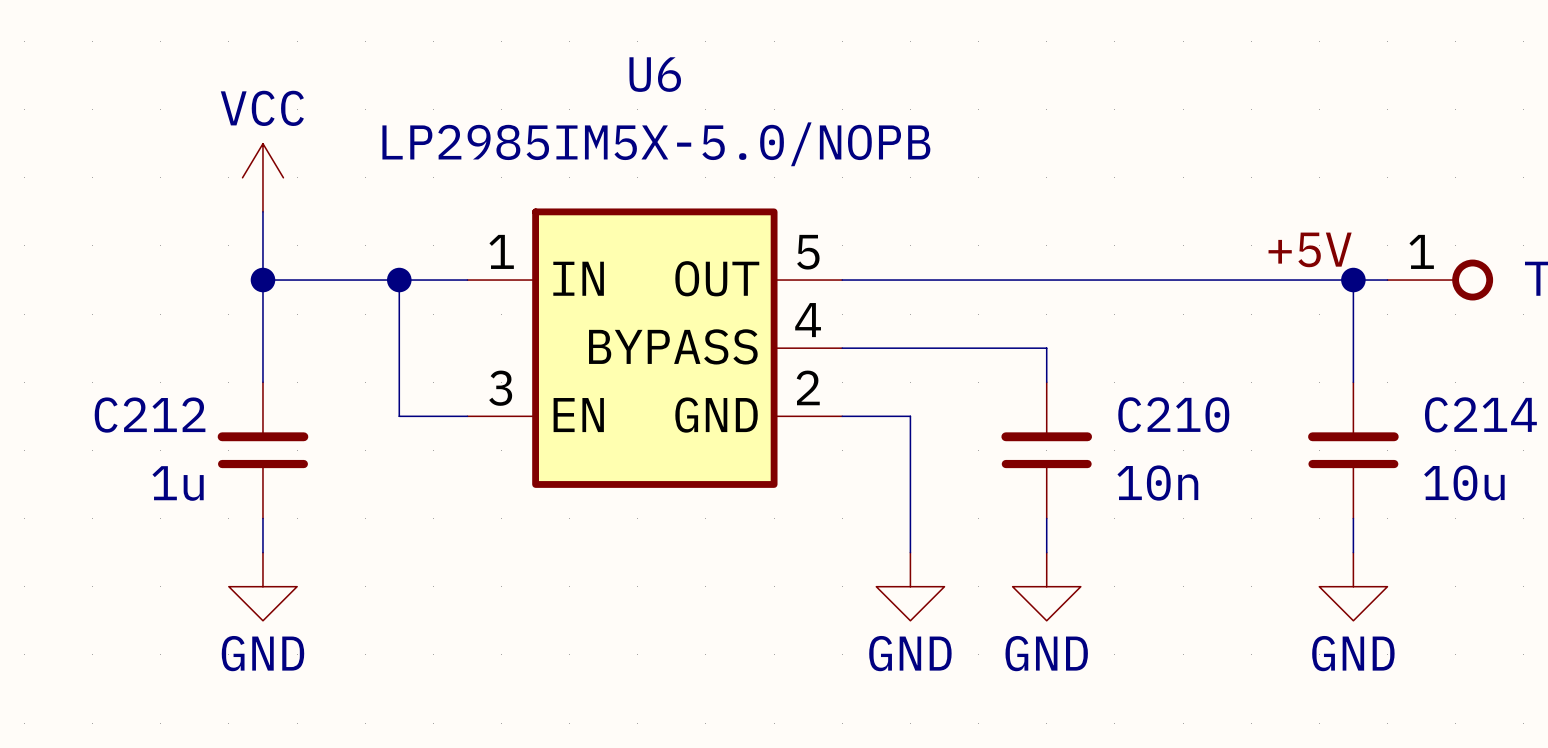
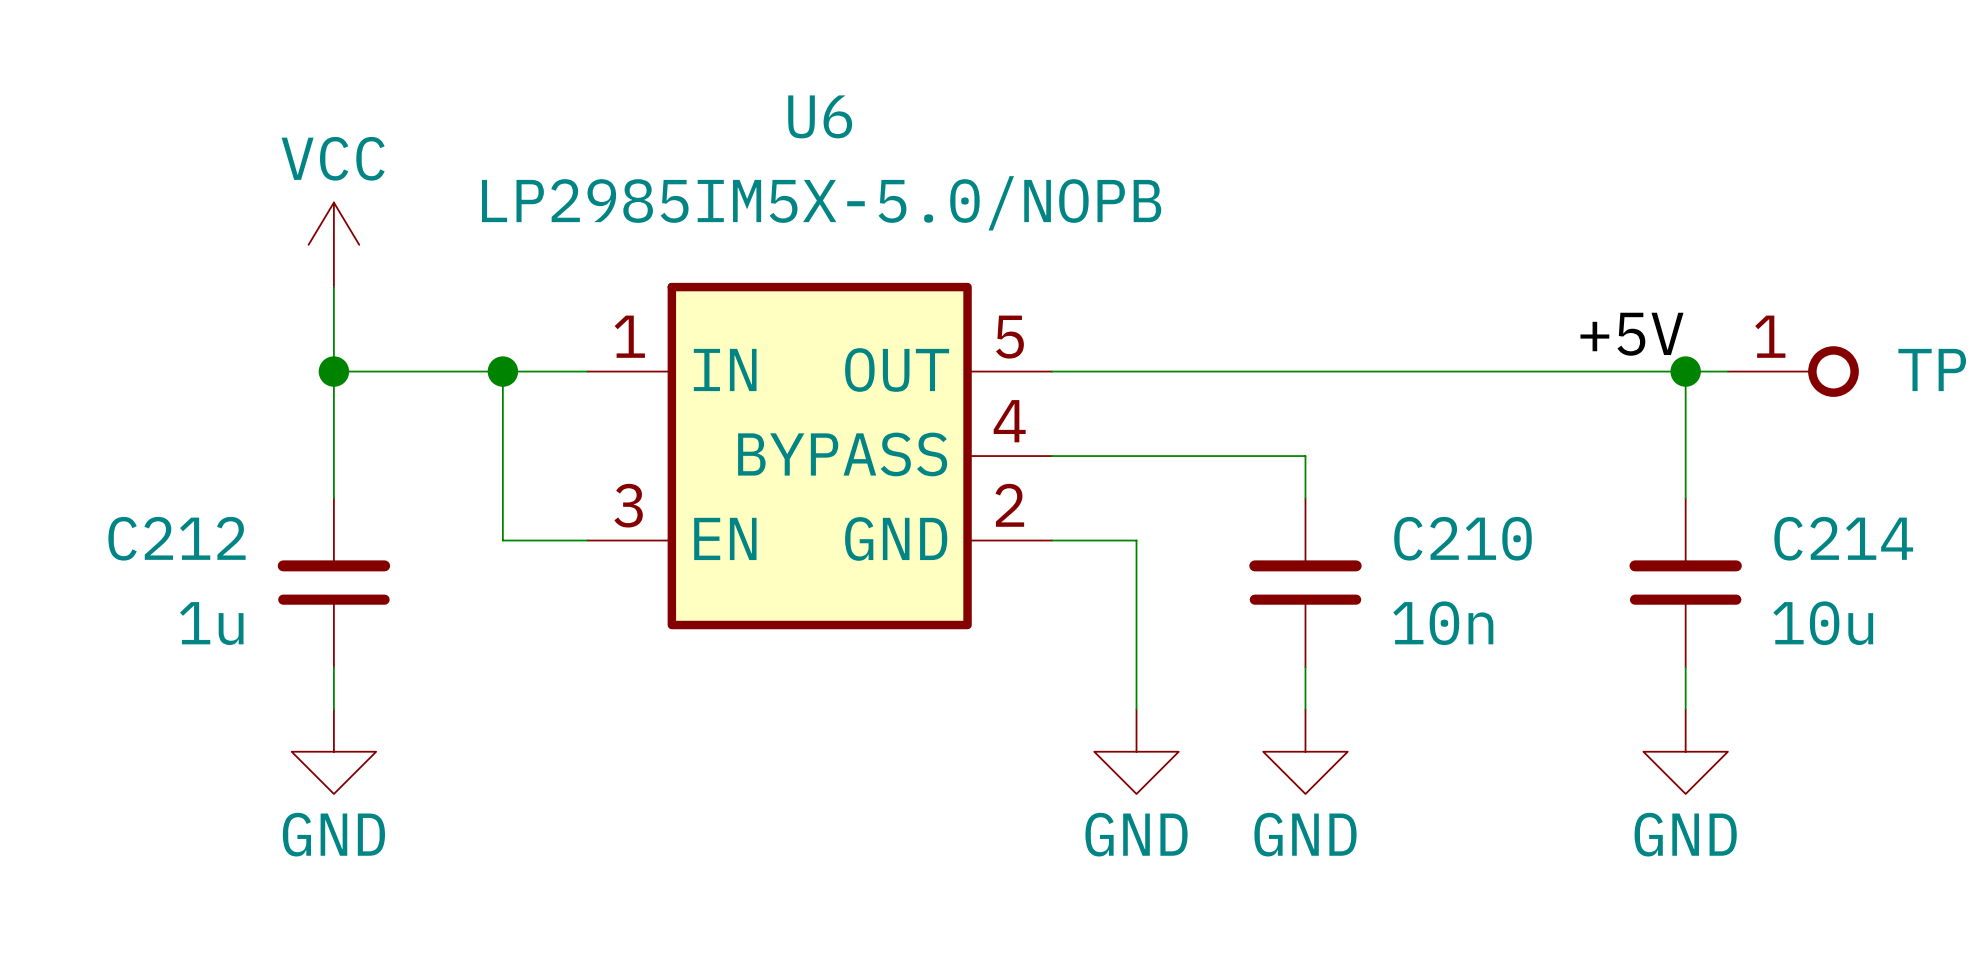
C212 name position: C212 (150, 415) -> C212 (177, 538)
C212 text position: 1u (178, 483) -> 1u (211, 623)

